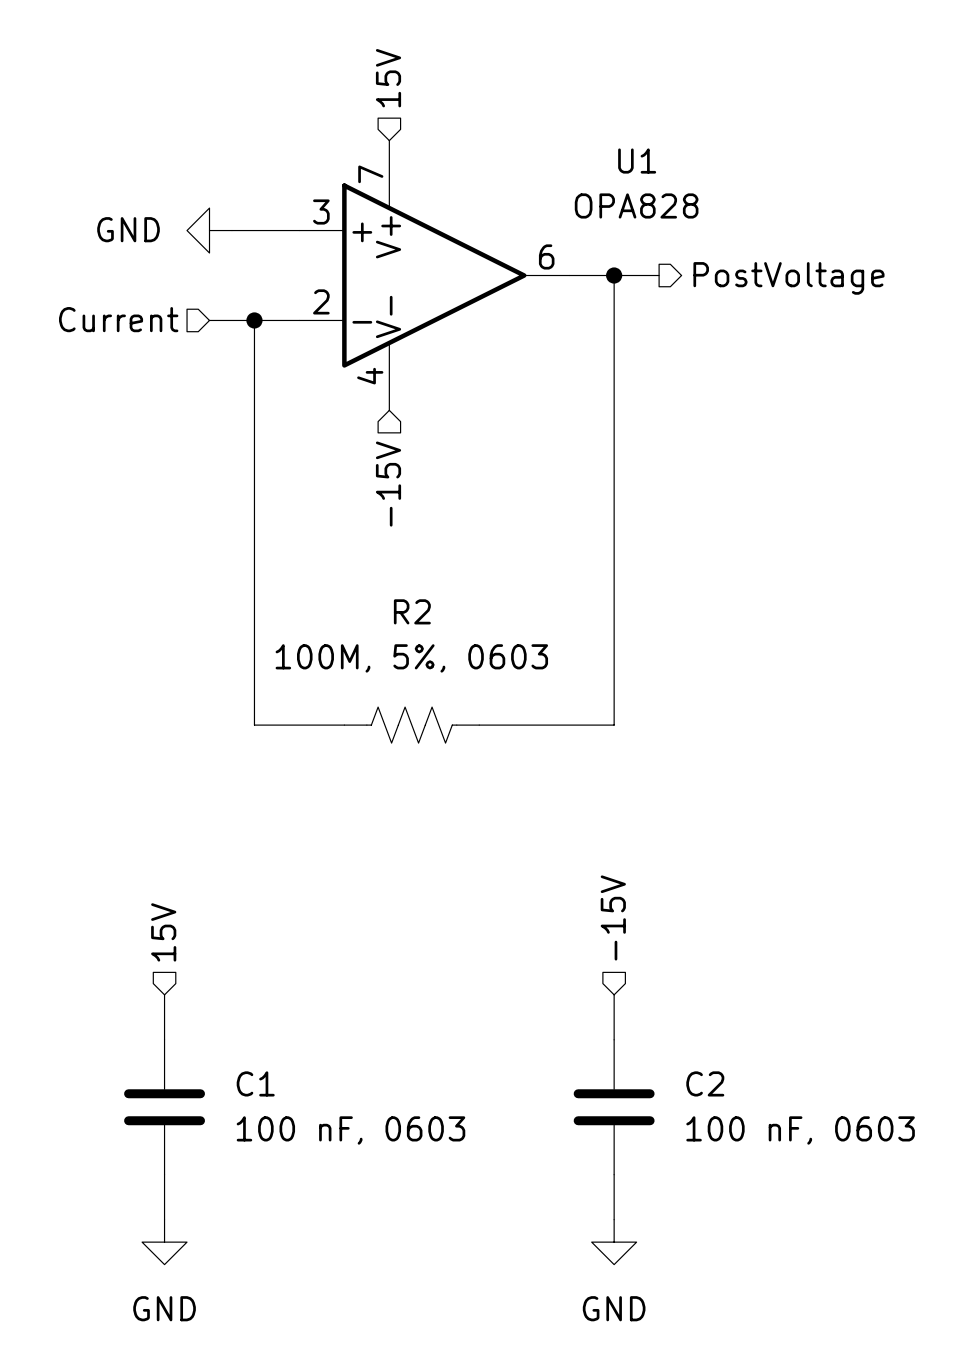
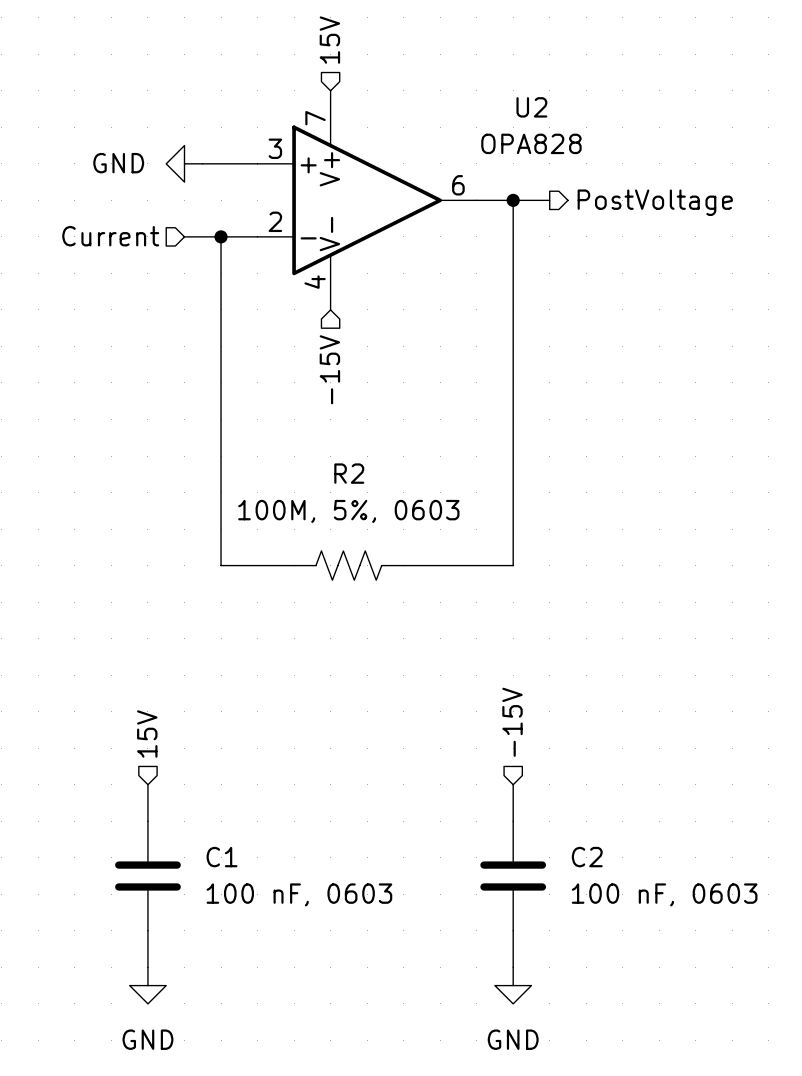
U1 name: U1 (637, 161) -> U2 (531, 107)

